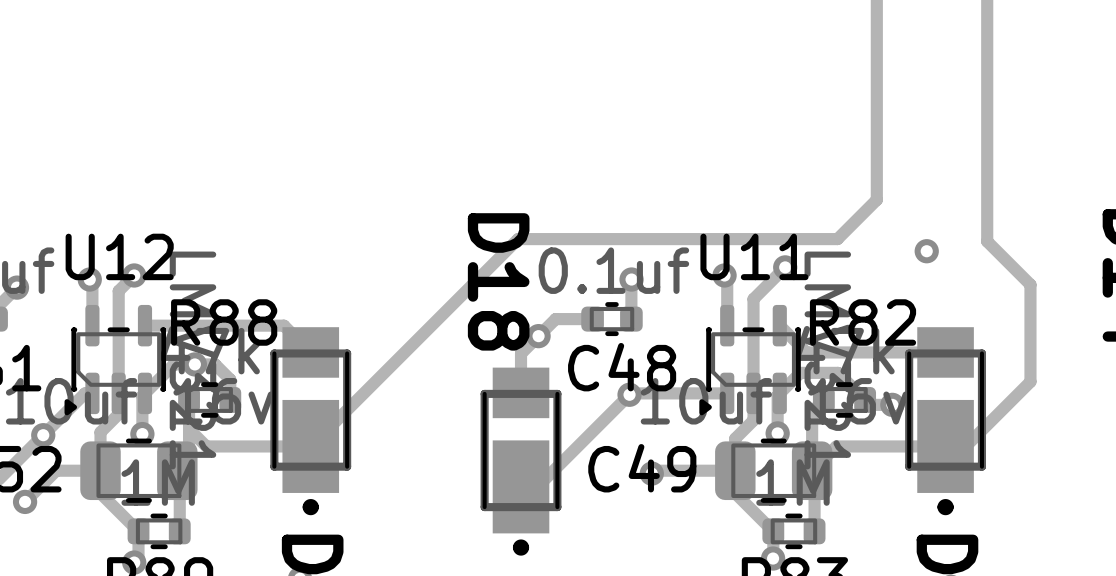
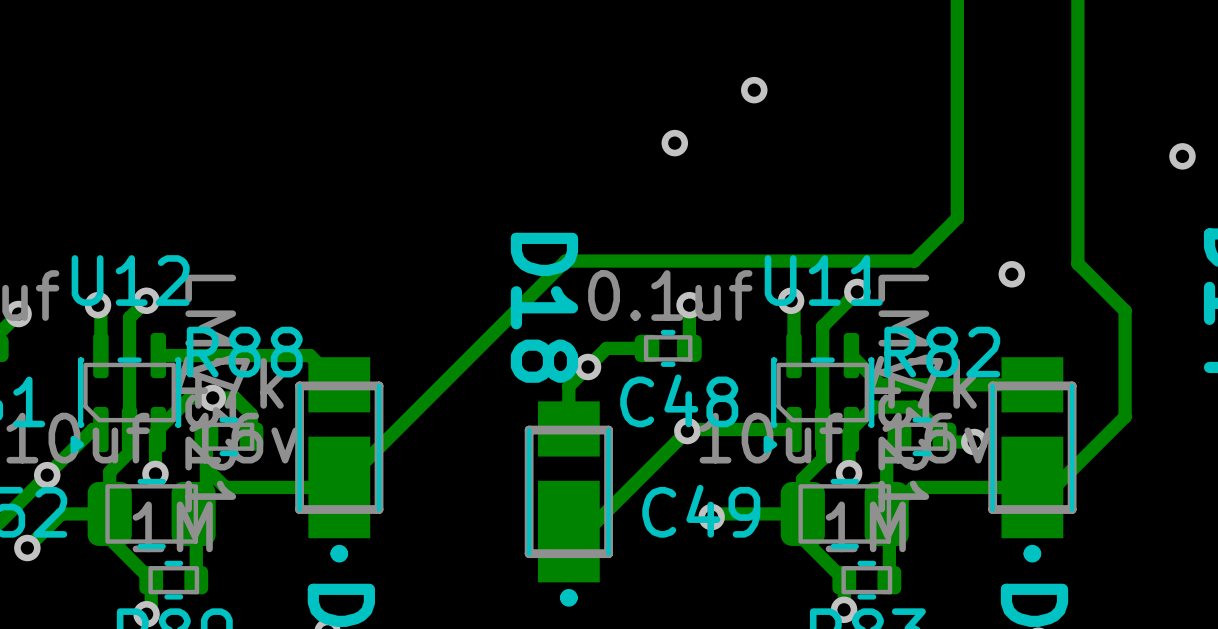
via: none -> (754, 90)
via: none -> (674, 143)
via: none -> (1182, 156)

